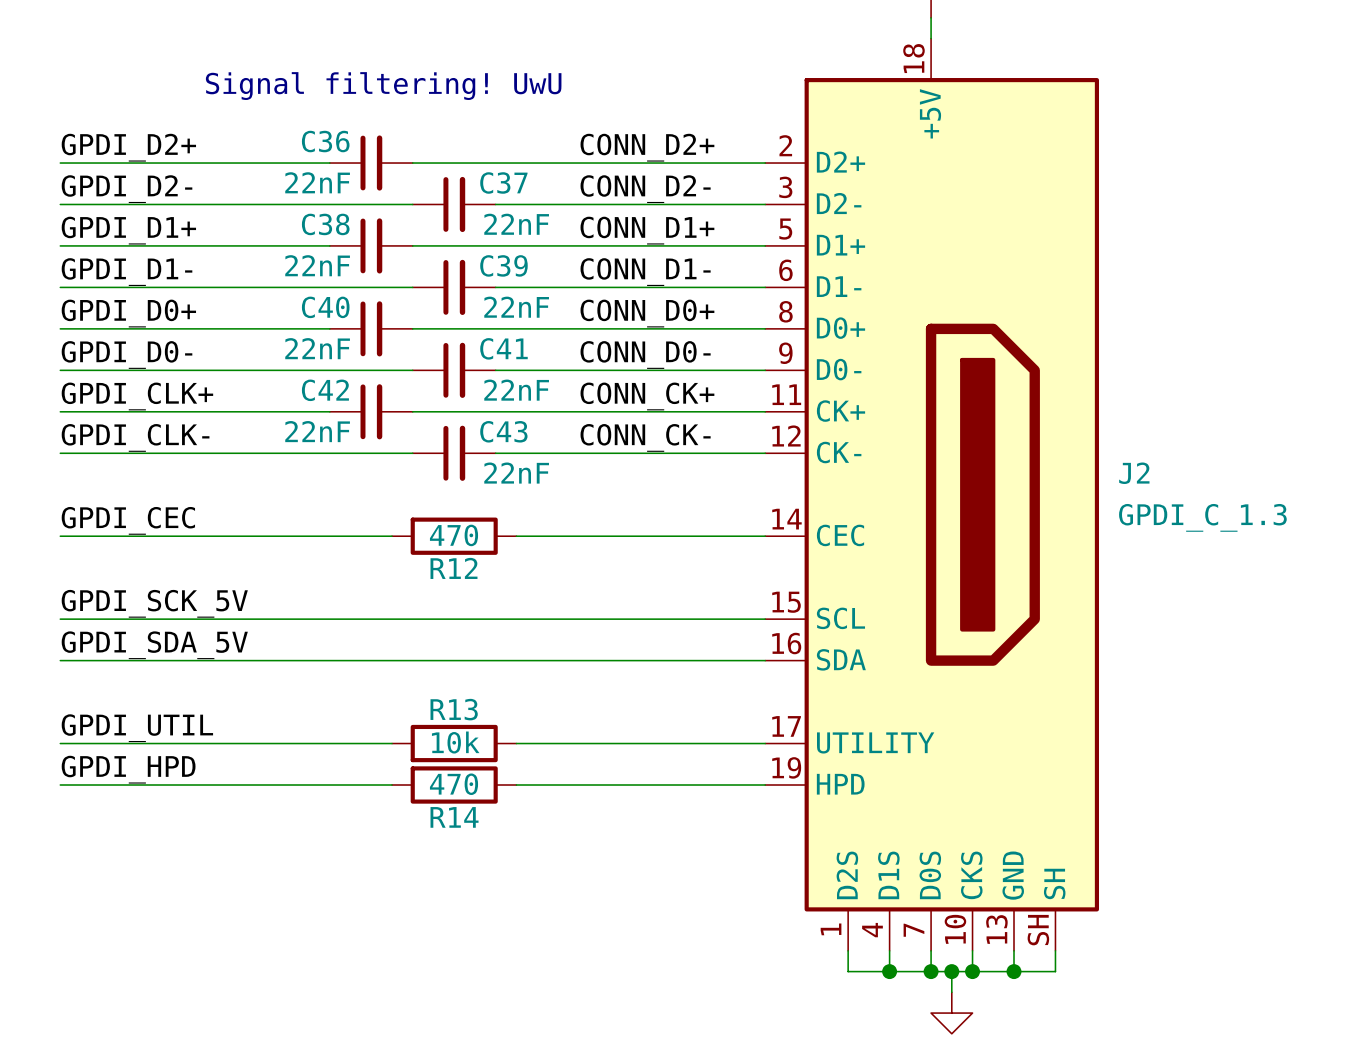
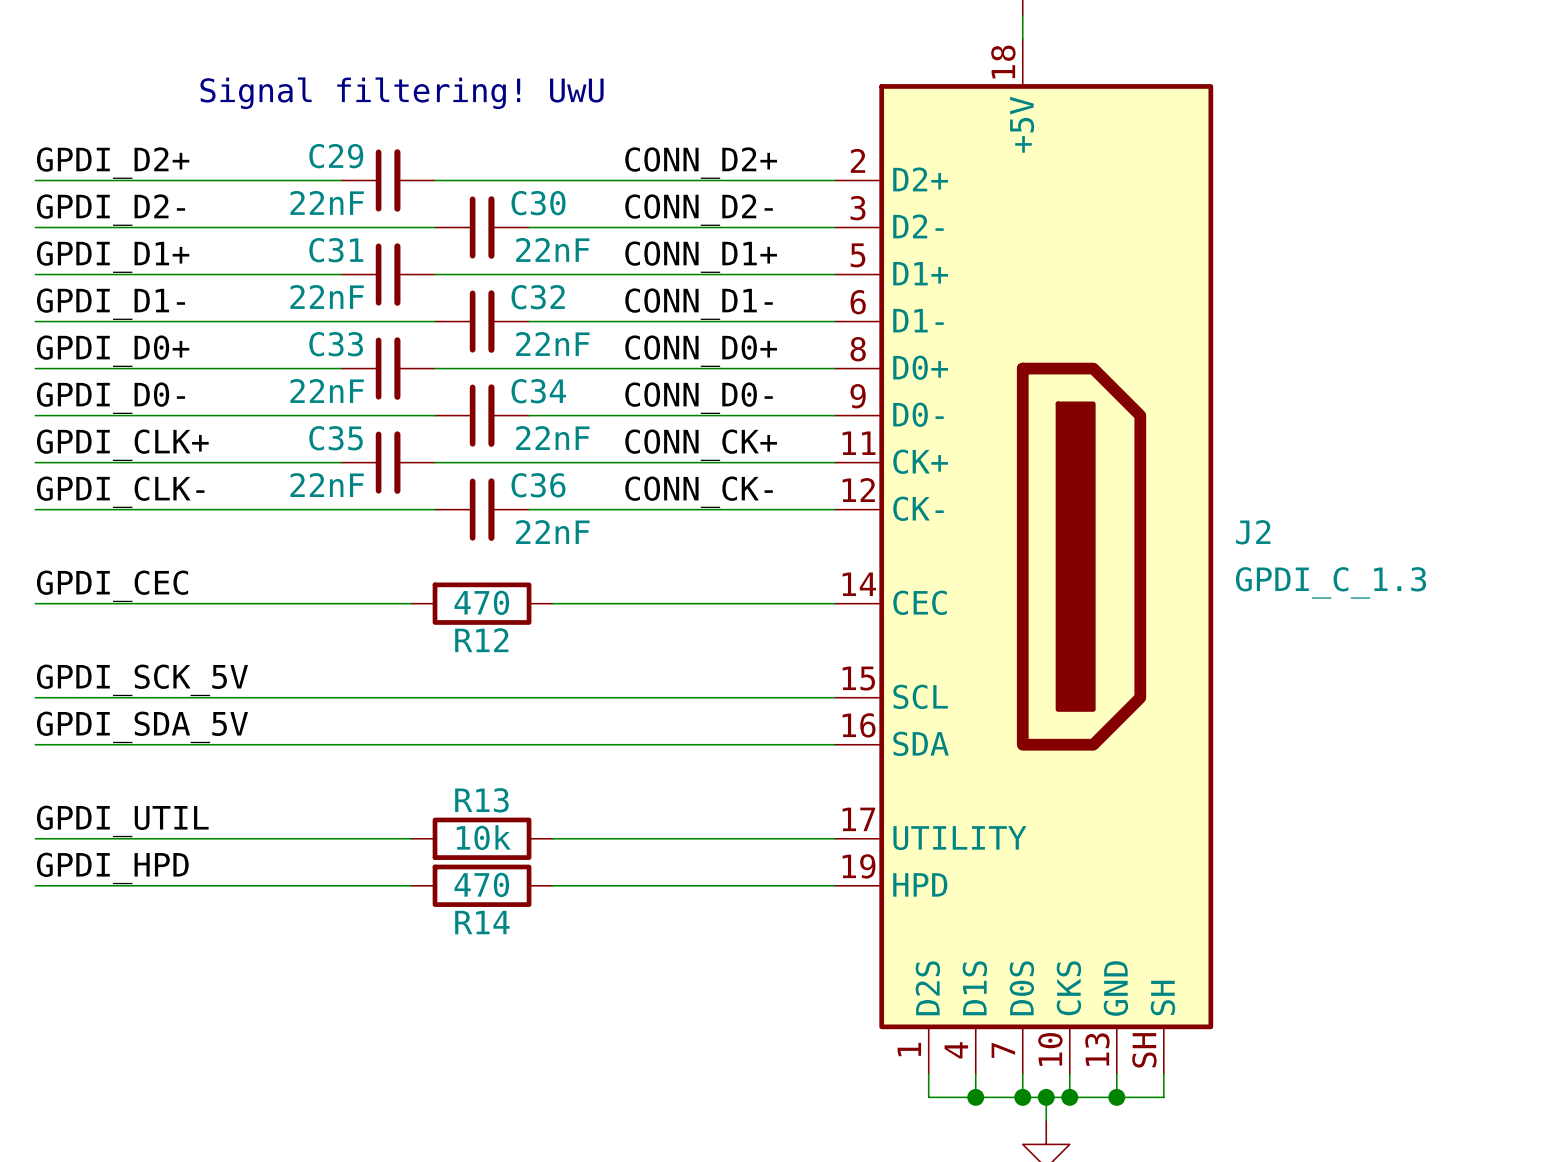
C36 name: C36 (325, 141) -> C29 (336, 156)
C37 name: C37 (503, 182) -> C30 (538, 203)
C38 name: C38 (325, 224) -> C31 (336, 250)
C39 name: C39 (503, 265) -> C32 (538, 297)
C40 name: C40 (325, 307) -> C33 (336, 344)
C41 name: C41 (503, 348) -> C34 (538, 391)
C42 name: C42 (325, 390) -> C35 (336, 438)
C43 name: C43 (503, 431) -> C36 (538, 485)

